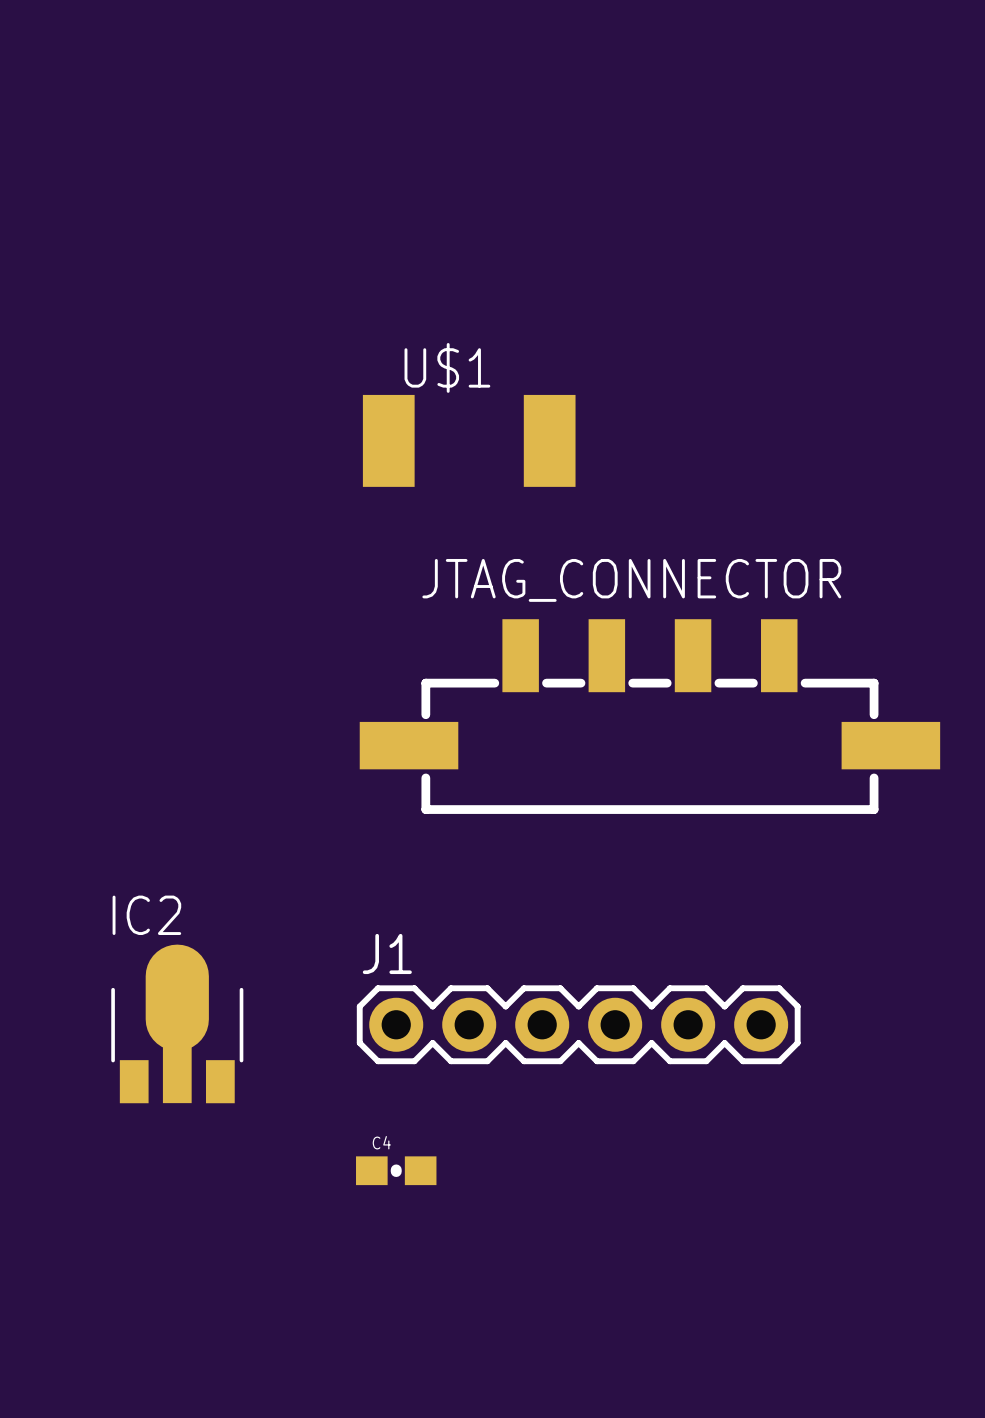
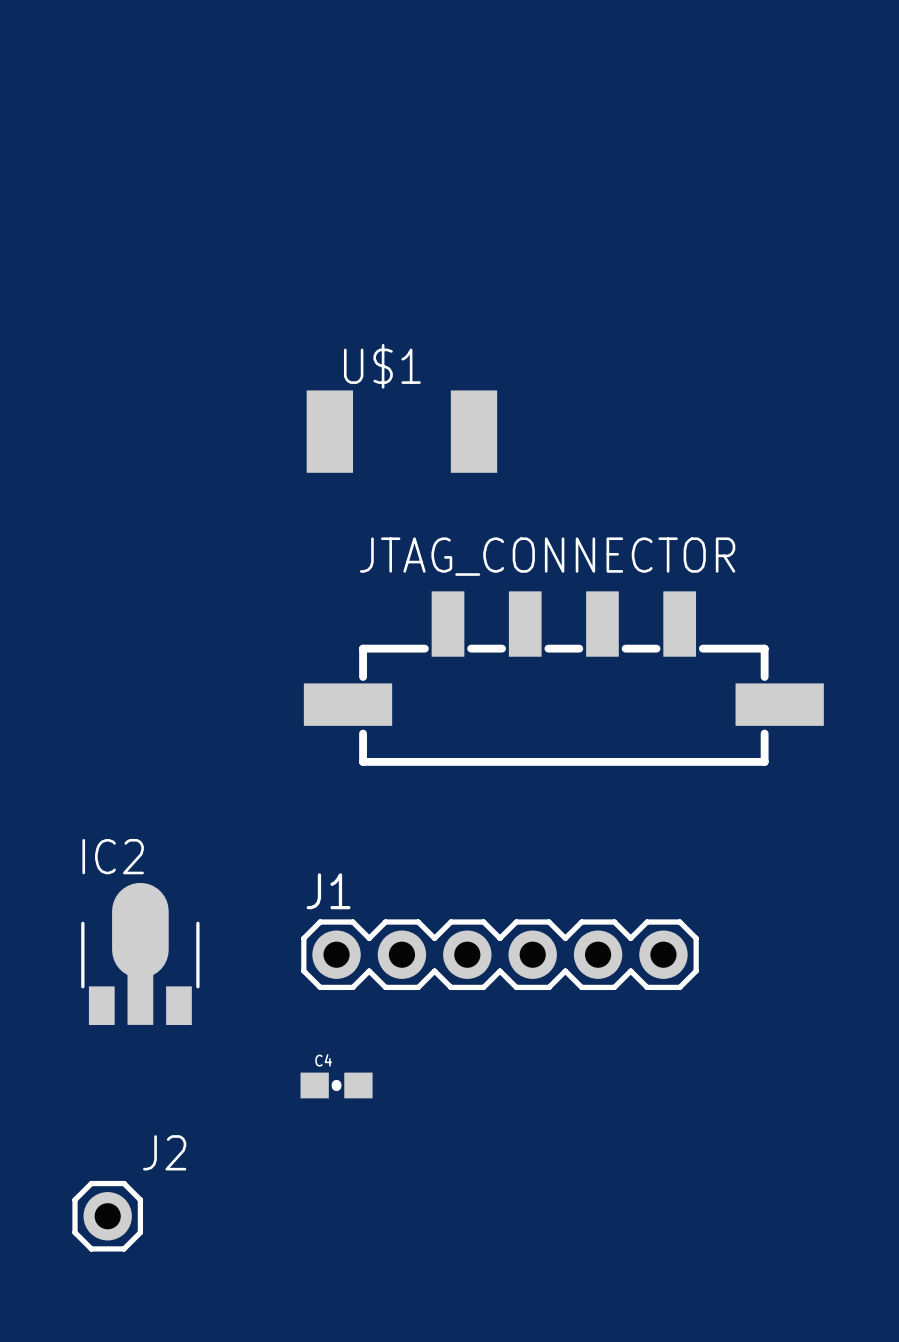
J2: none -> (107, 1216)

